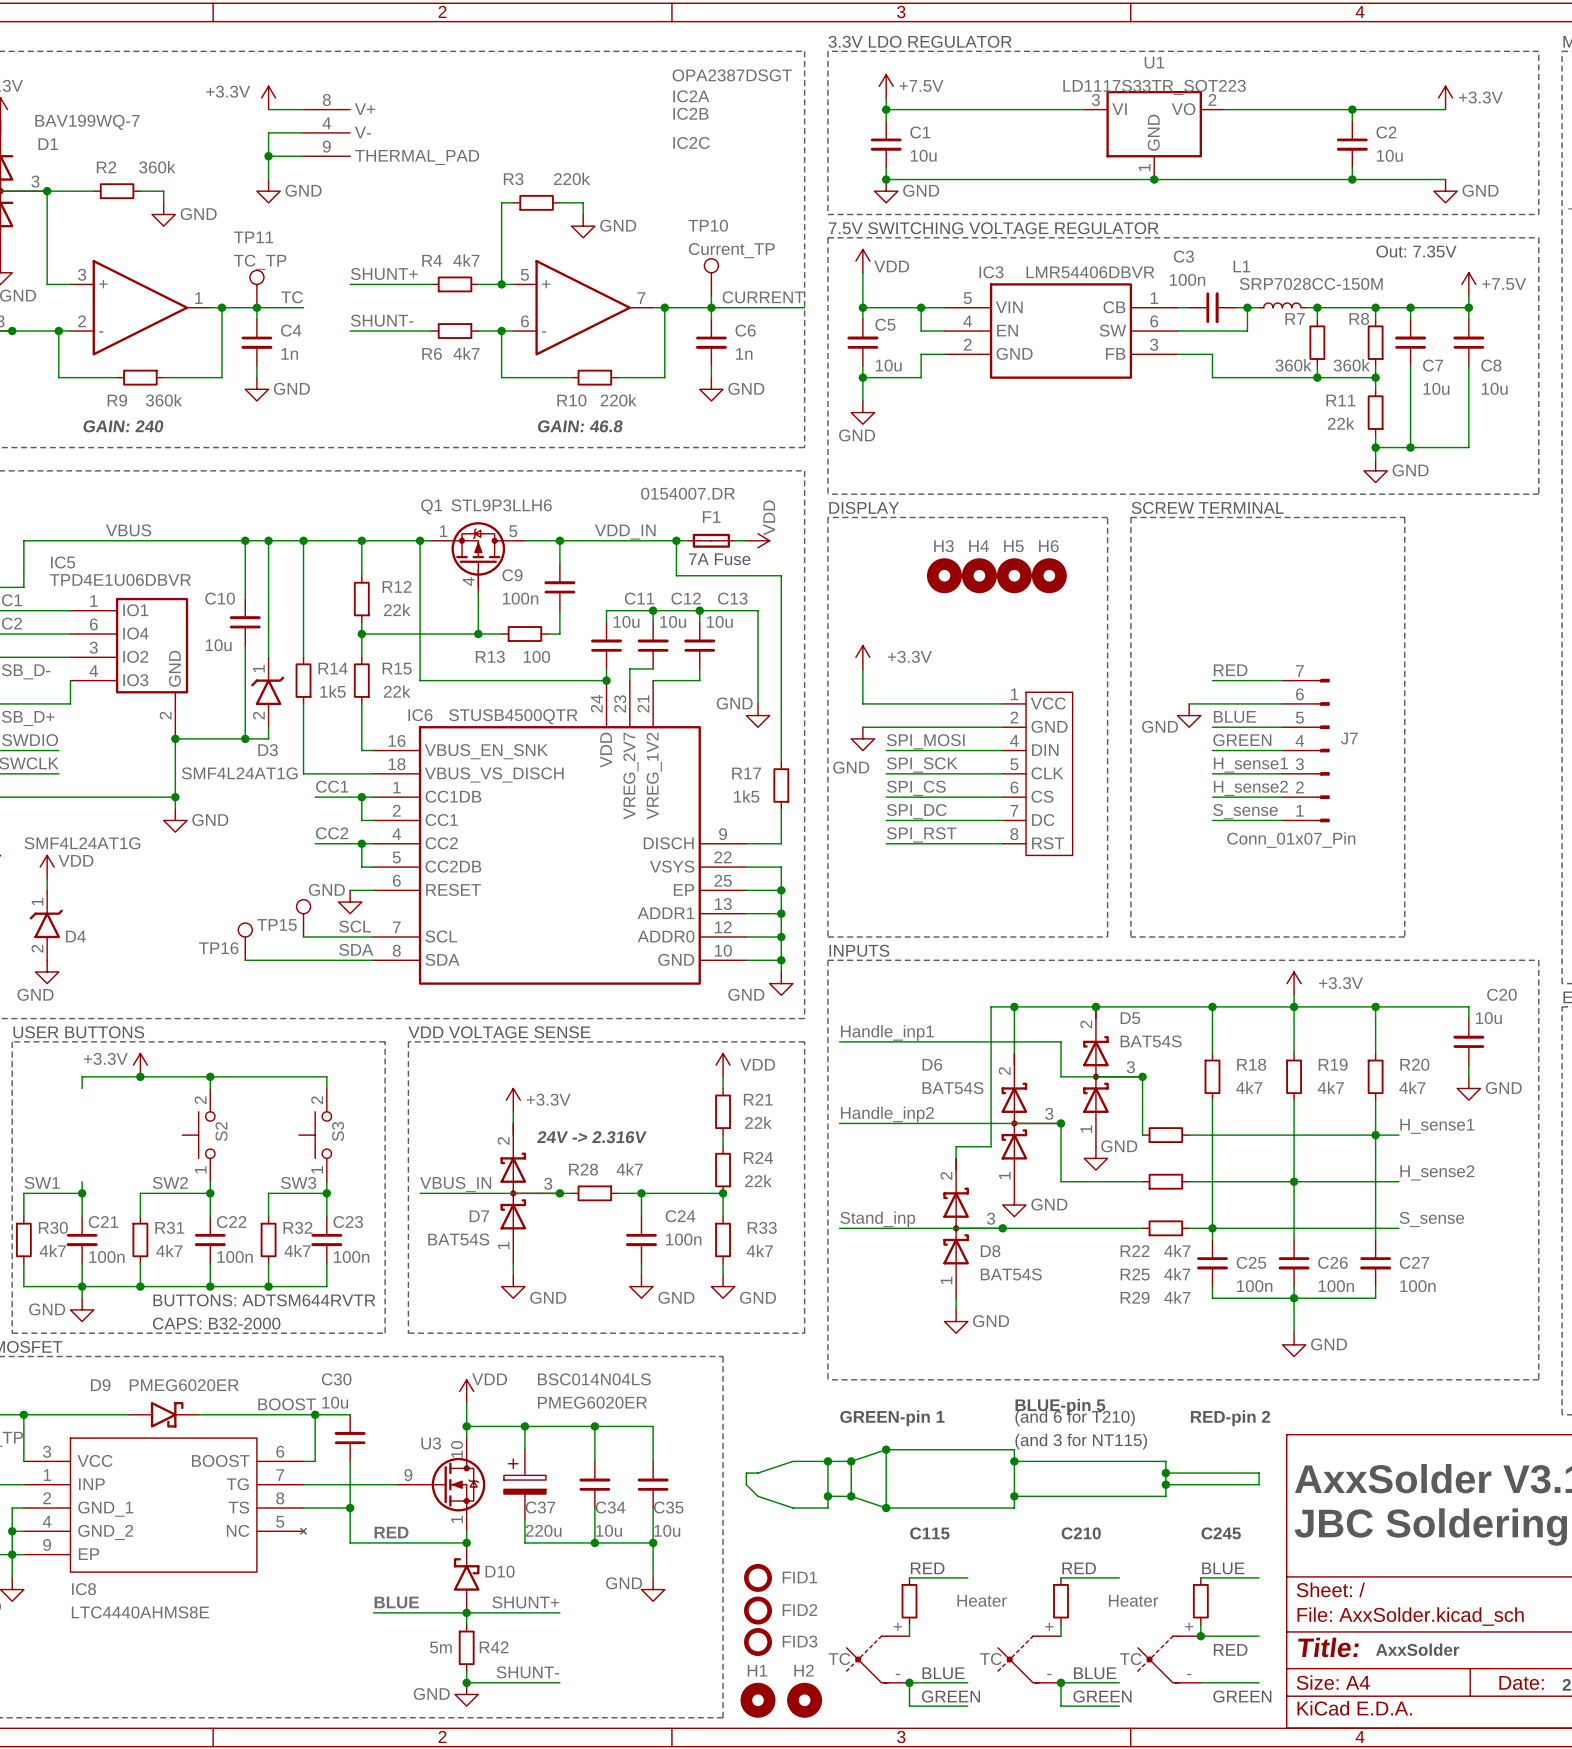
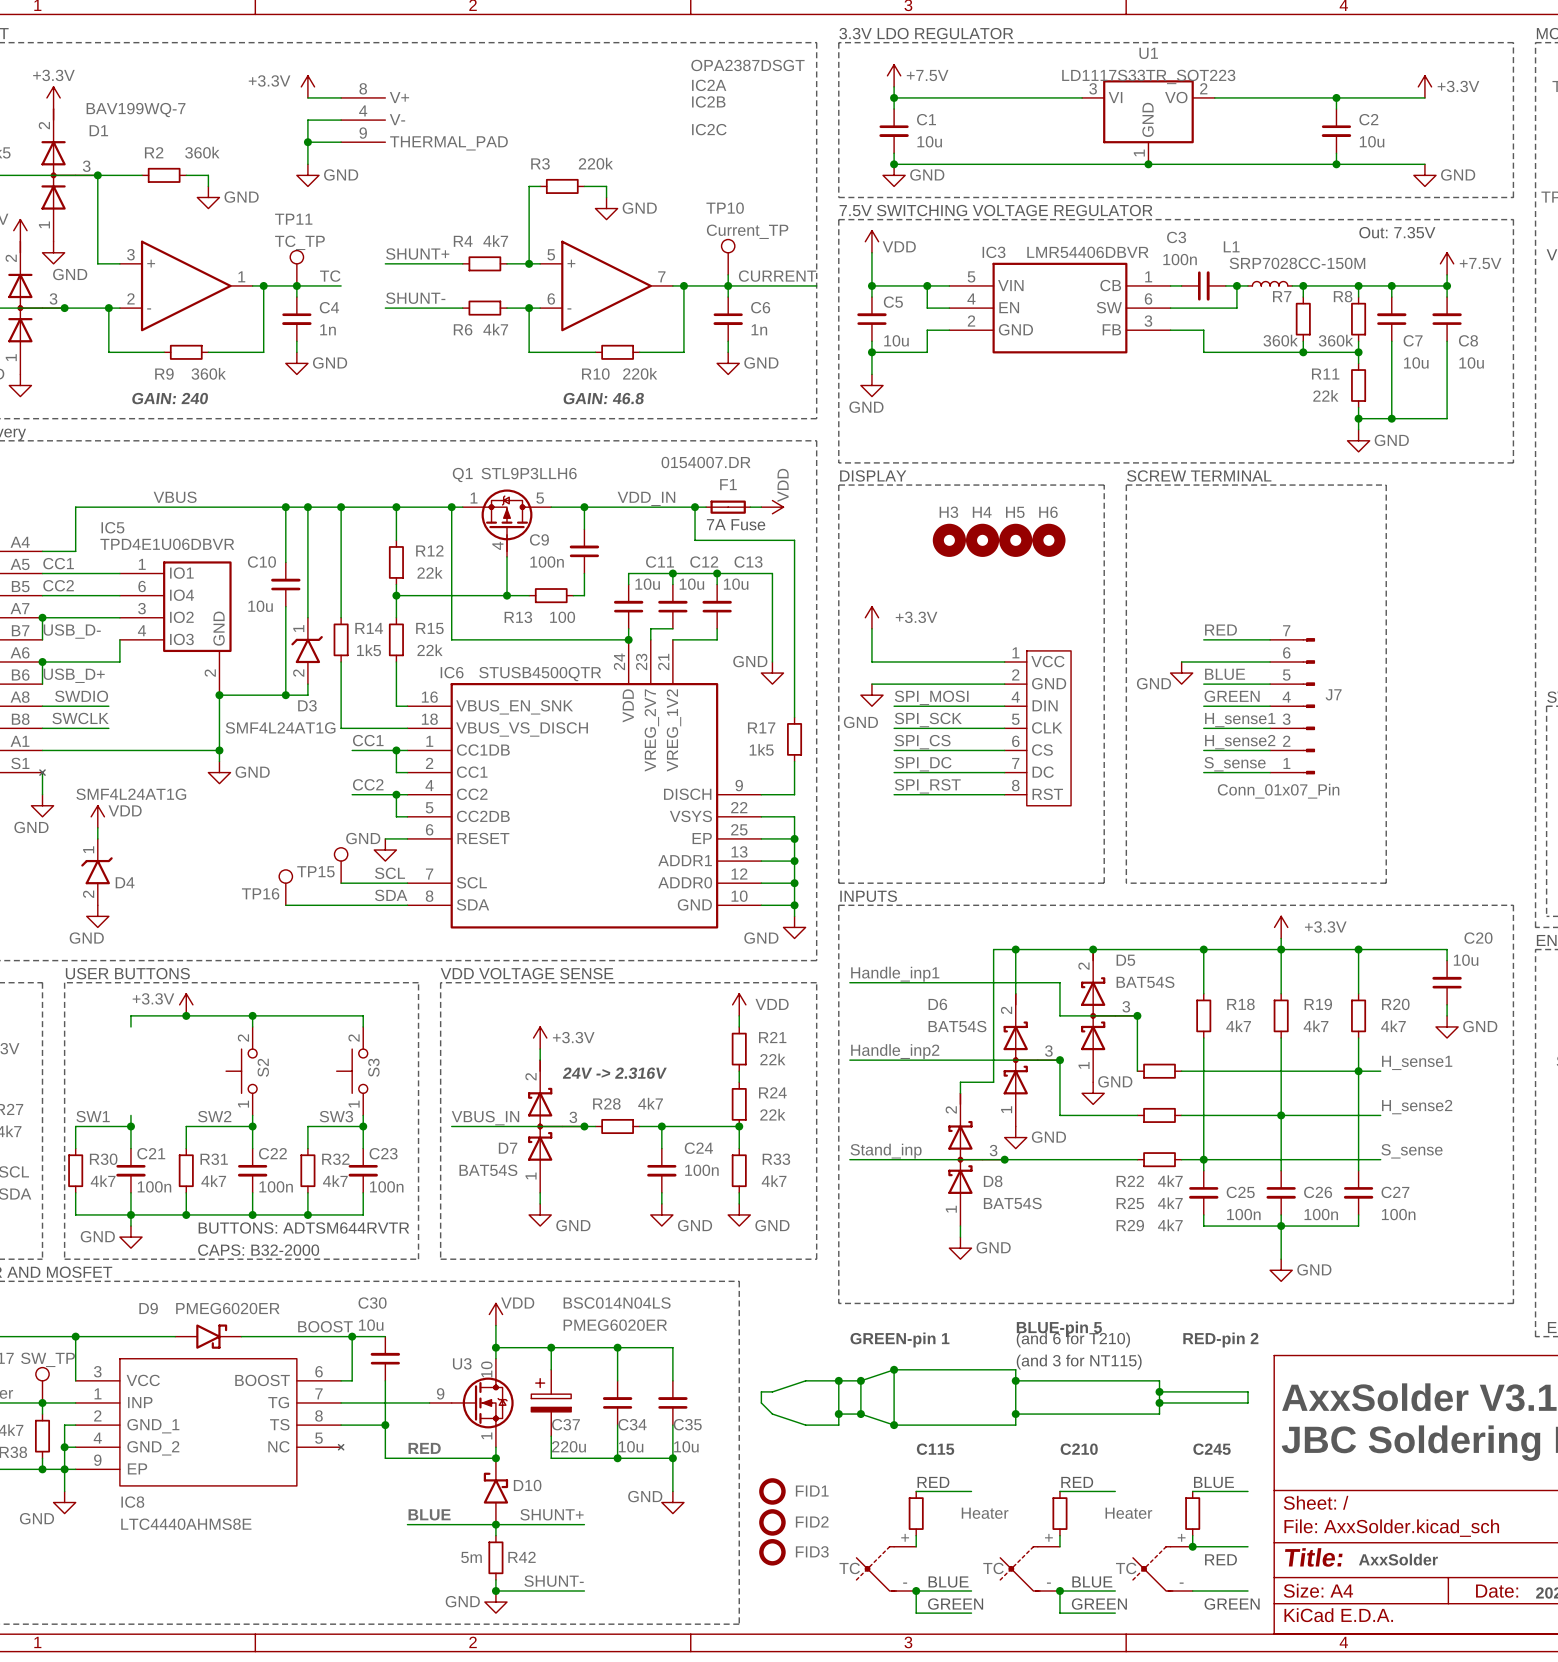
H1: (758, 1700) -> none
H2: (804, 1700) -> none

